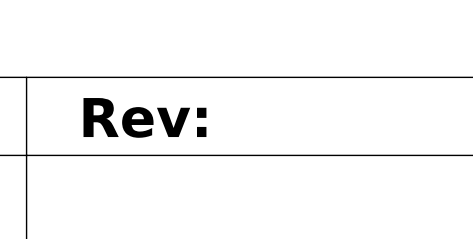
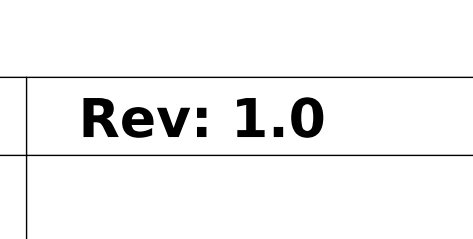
title block: Rev: (144, 117) -> Rev: 1.0 (203, 117)

